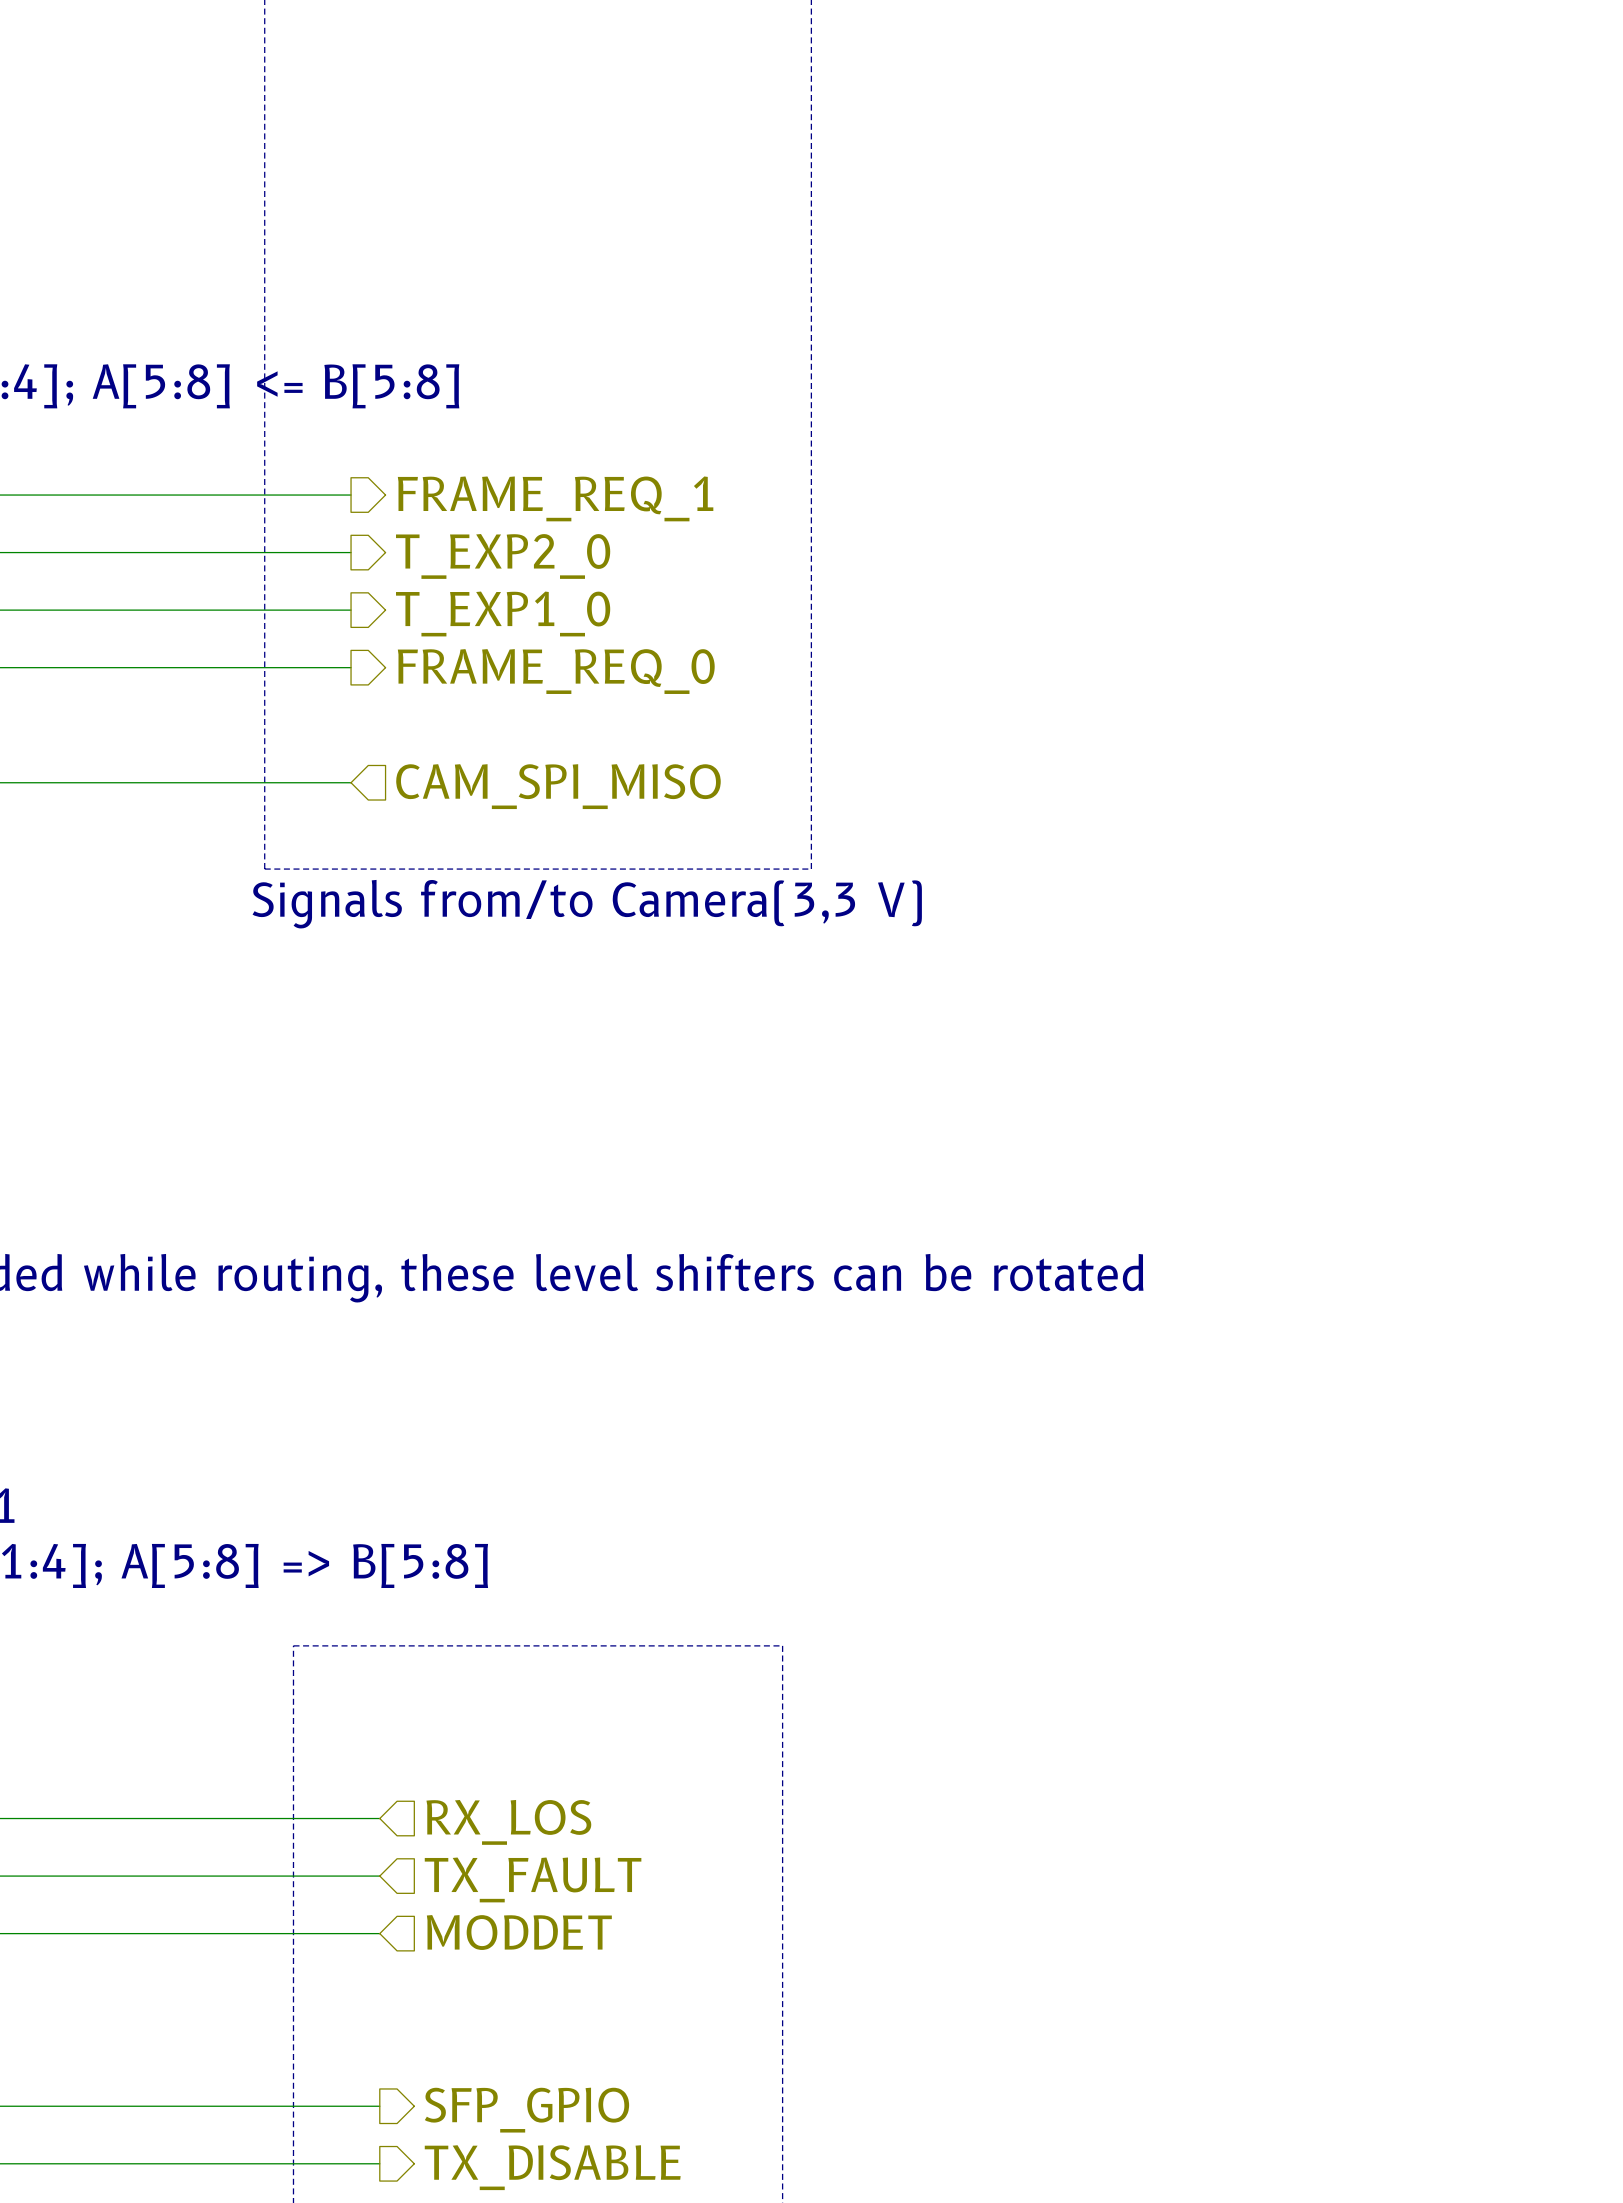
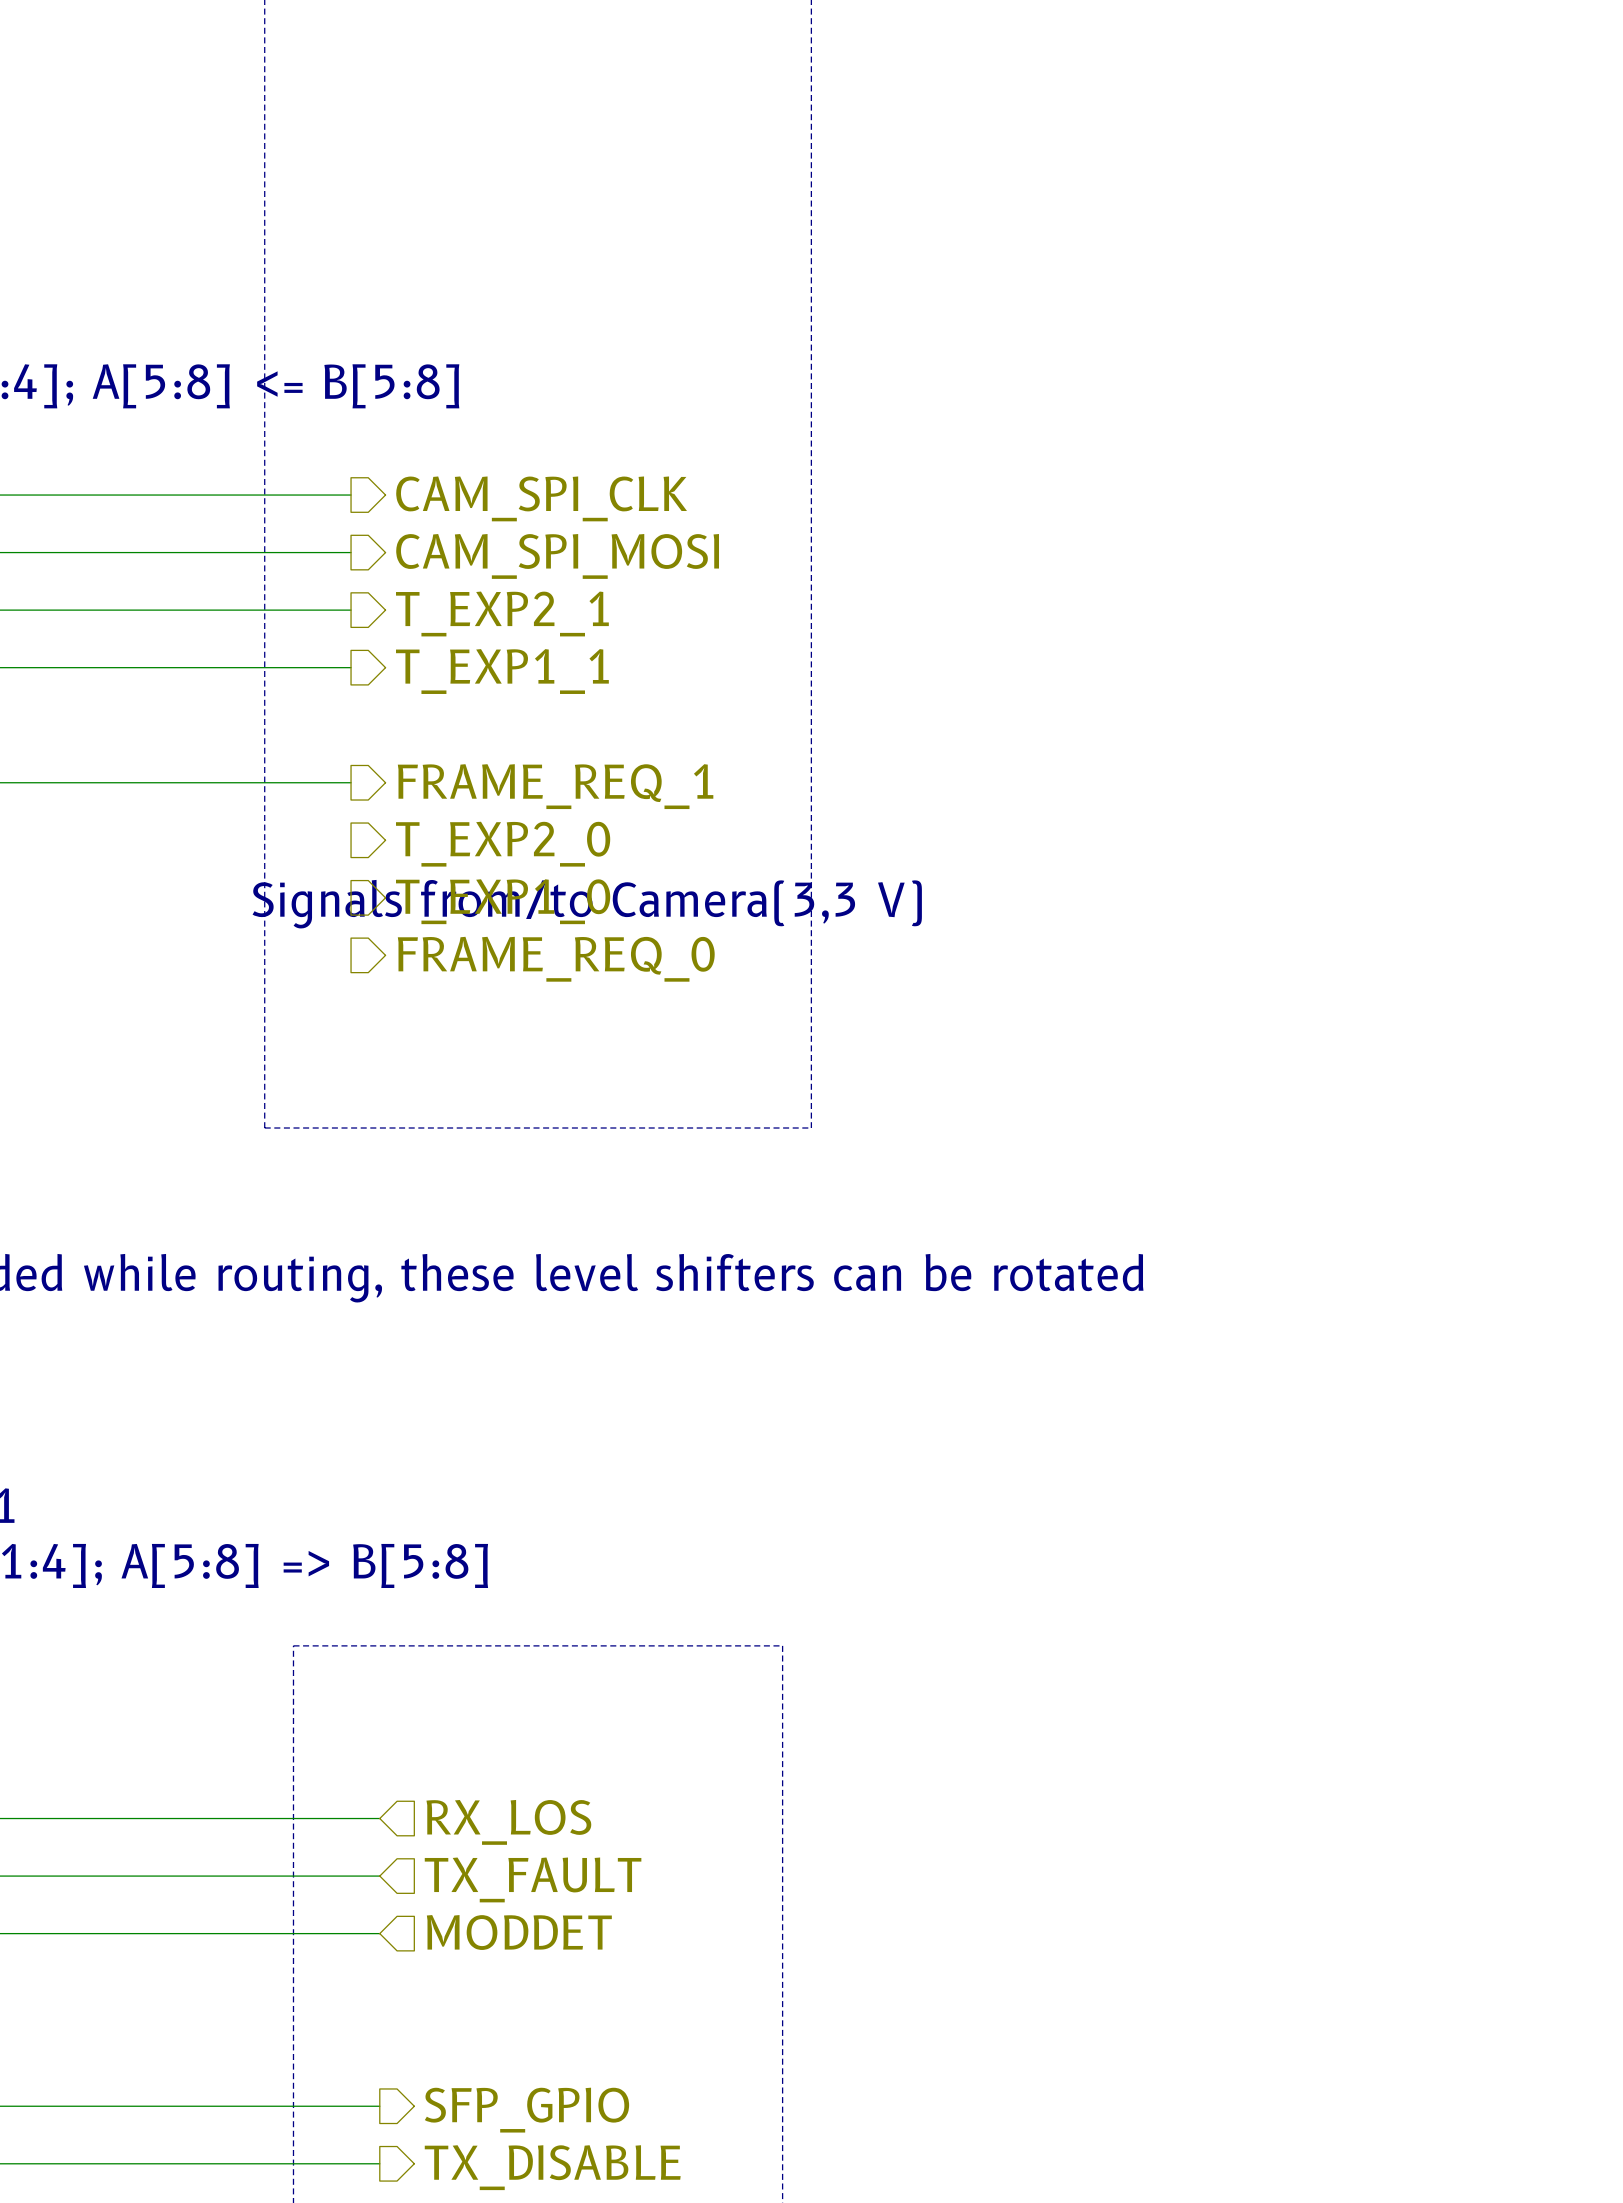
hierarchical label: FRAME_REQ_1 (555, 498) -> CAM_SPI_CLK (541, 498)
hierarchical label: T_EXP2_0 (503, 556) -> CAM_SPI_MOSI (557, 556)
hierarchical label: T_EXP1_0 (503, 613) -> T_EXP2_1 (502, 613)
hierarchical label: FRAME_REQ_0 (556, 671) -> T_EXP1_1 (502, 671)
hierarchical label shape: input (558, 786) -> output (555, 786)
hierarchical label: CAM_SPI_MISO (558, 786) -> FRAME_REQ_1 (555, 786)
hierarchical label: none -> T_EXP2_0 (503, 844)
line: (264, 869) (811, 869) -> (264, 869) (264, 1128) (811, 1128) (811, 869)
hierarchical label: none -> T_EXP1_0 (503, 901)
hierarchical label: none -> FRAME_REQ_0 (556, 959)

